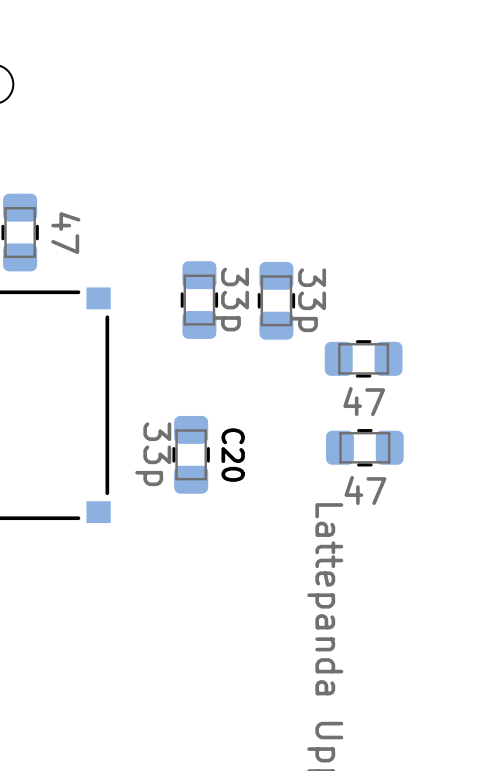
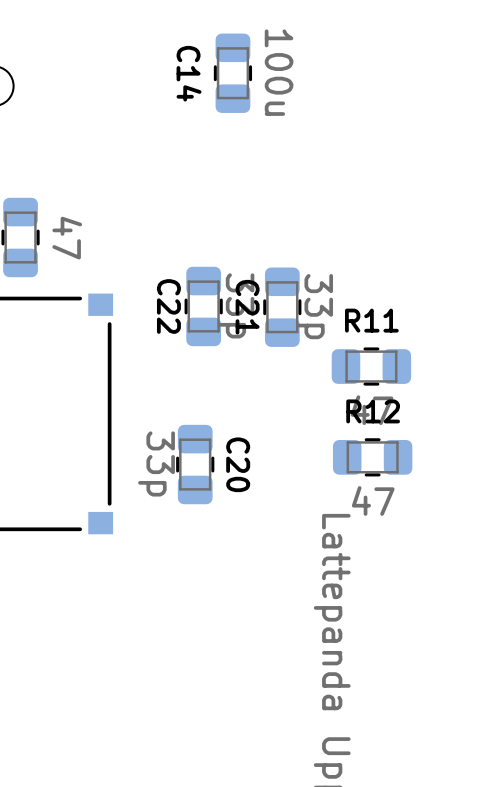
C14: none -> 100u (232, 73)
C22 name: none -> C22 (168, 306)
C21 name: none -> C21 (247, 307)
R11 name: none -> R11 (371, 320)
R12 name: none -> R12 (373, 411)

